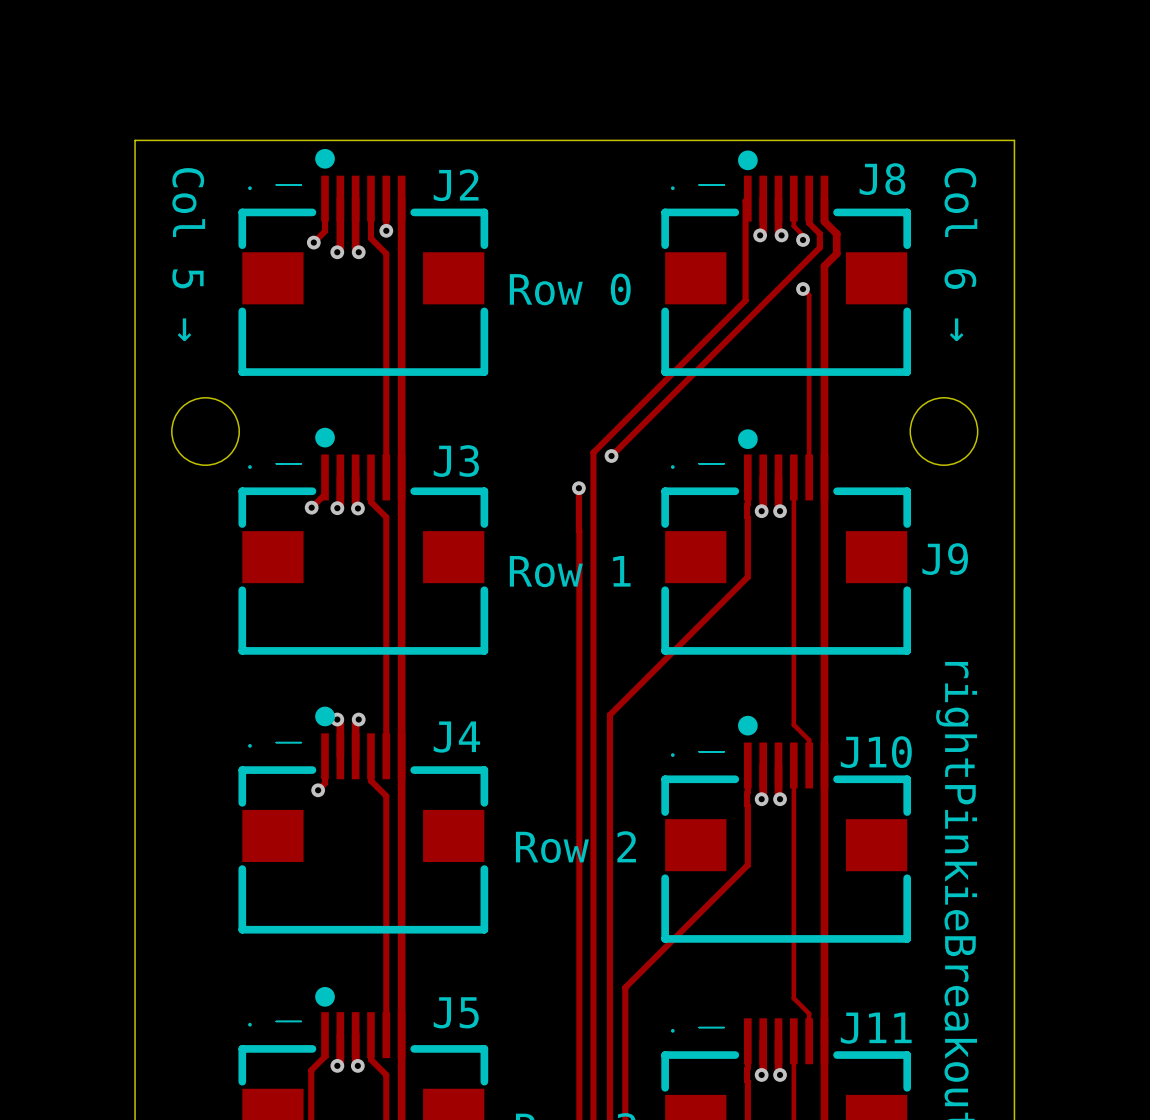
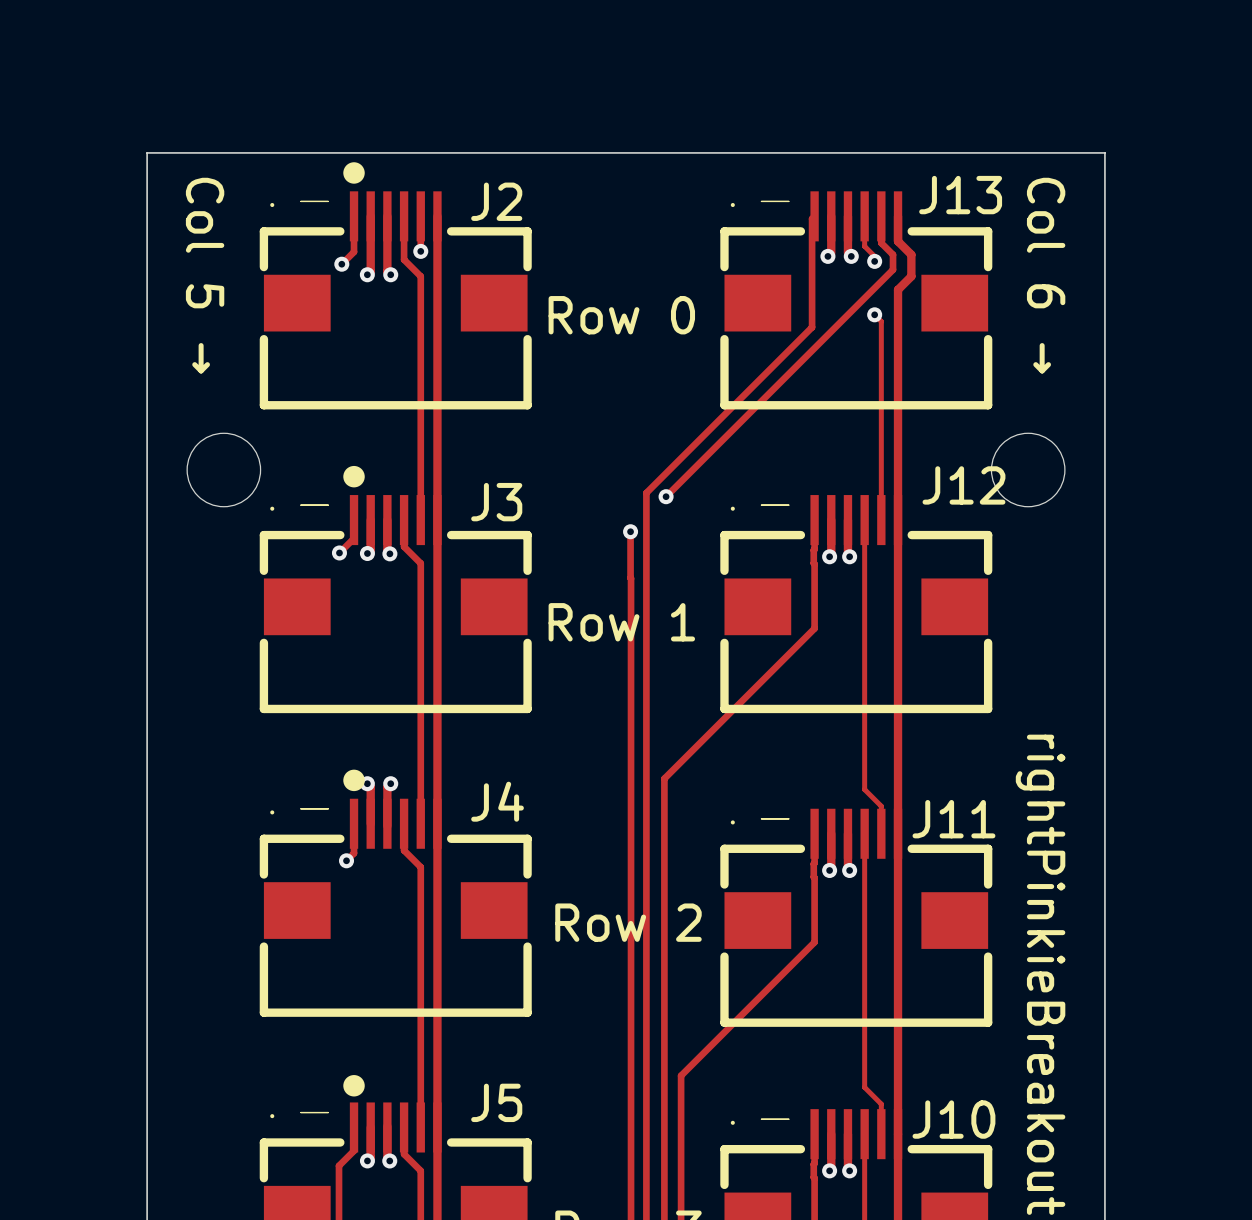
drawing: [738, 150, 758, 171] -> none
J8 name: J8 (882, 179) -> J13 (960, 195)
drawing: [738, 429, 758, 450] -> none
J9 name: J9 (945, 559) -> J12 (963, 485)
drawing: [738, 715, 758, 736] -> none
J10 name: J10 (876, 752) -> J11 (953, 819)
J11 name: J11 (876, 1028) -> J10 (953, 1119)

